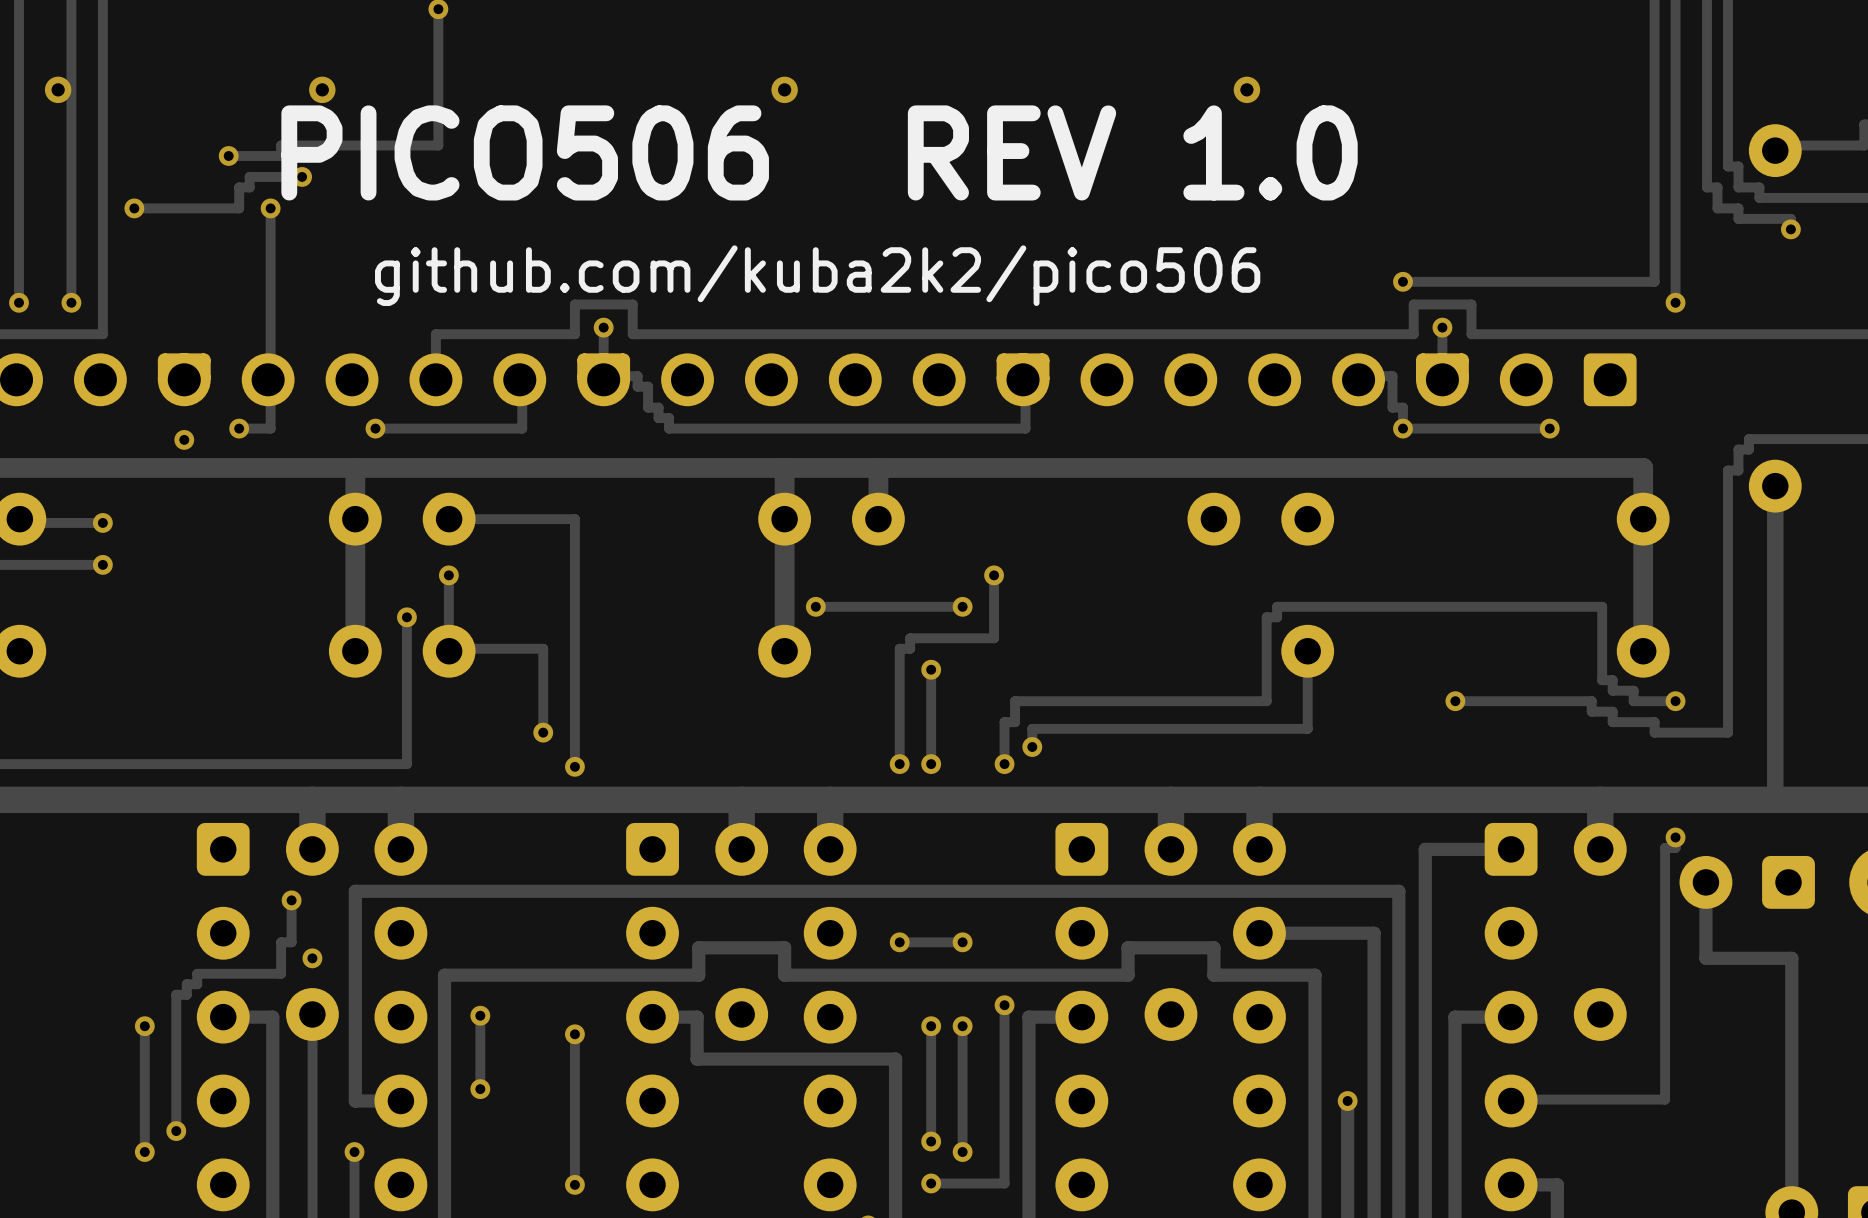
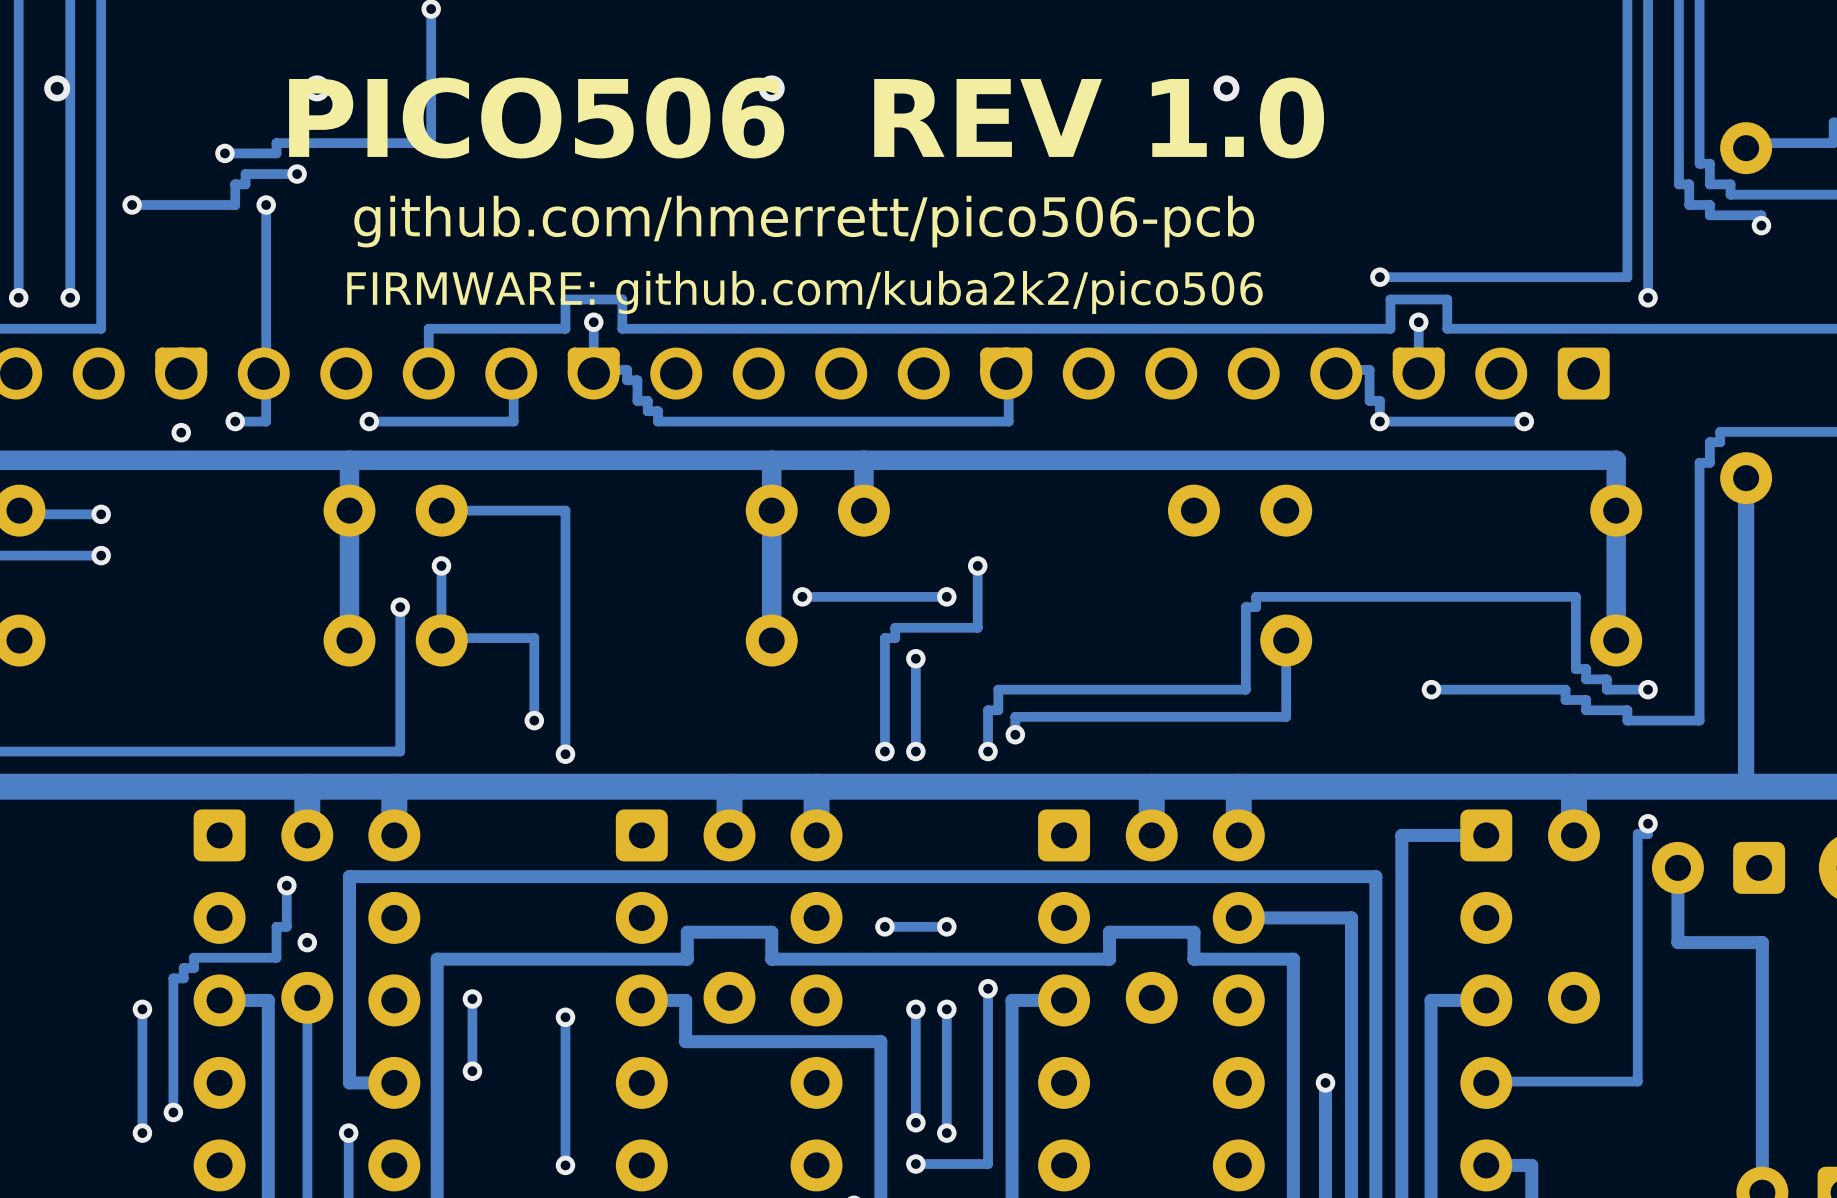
text position: PICO506 REV 1.0 (819, 152) -> PICO506 REV 1.0 (806, 118)
text: none -> github.com/hmerrett/pico506-pcb (804, 221)
text: github.com/kuba2k2/pico506 (817, 275) -> FIRMWARE: github.com/kuba2k2/pico506 (805, 292)

